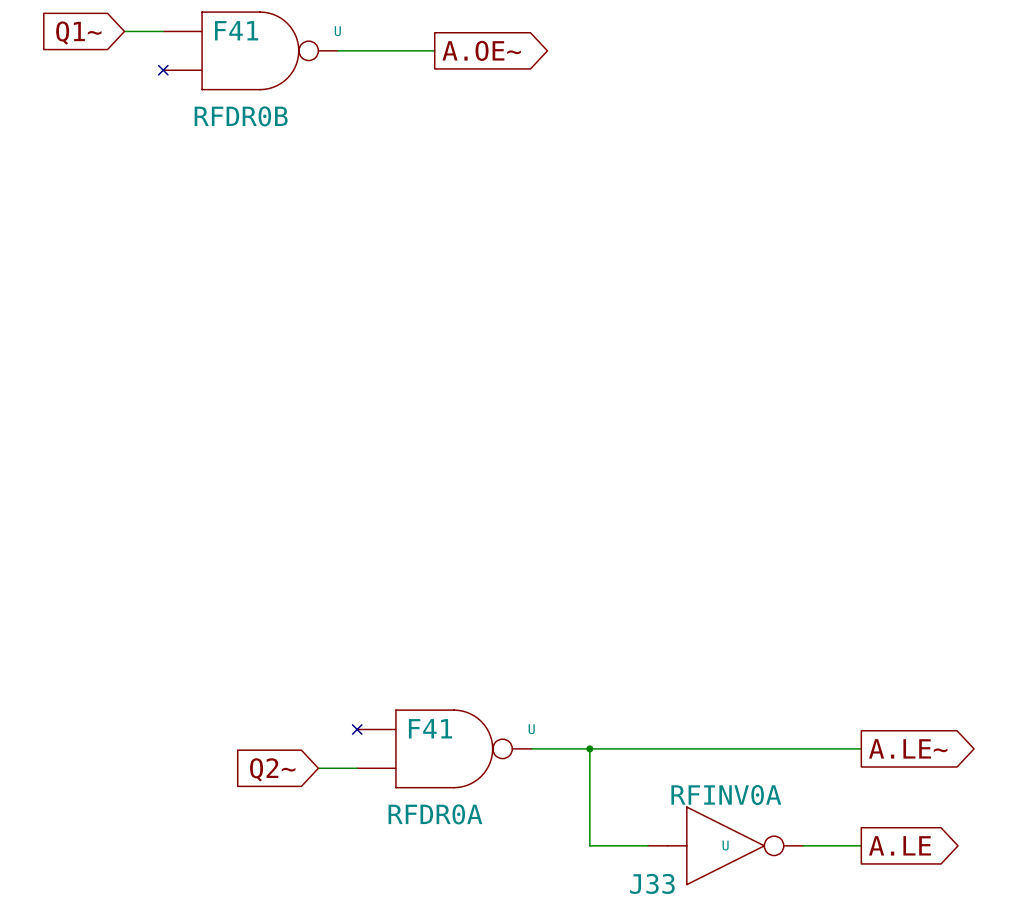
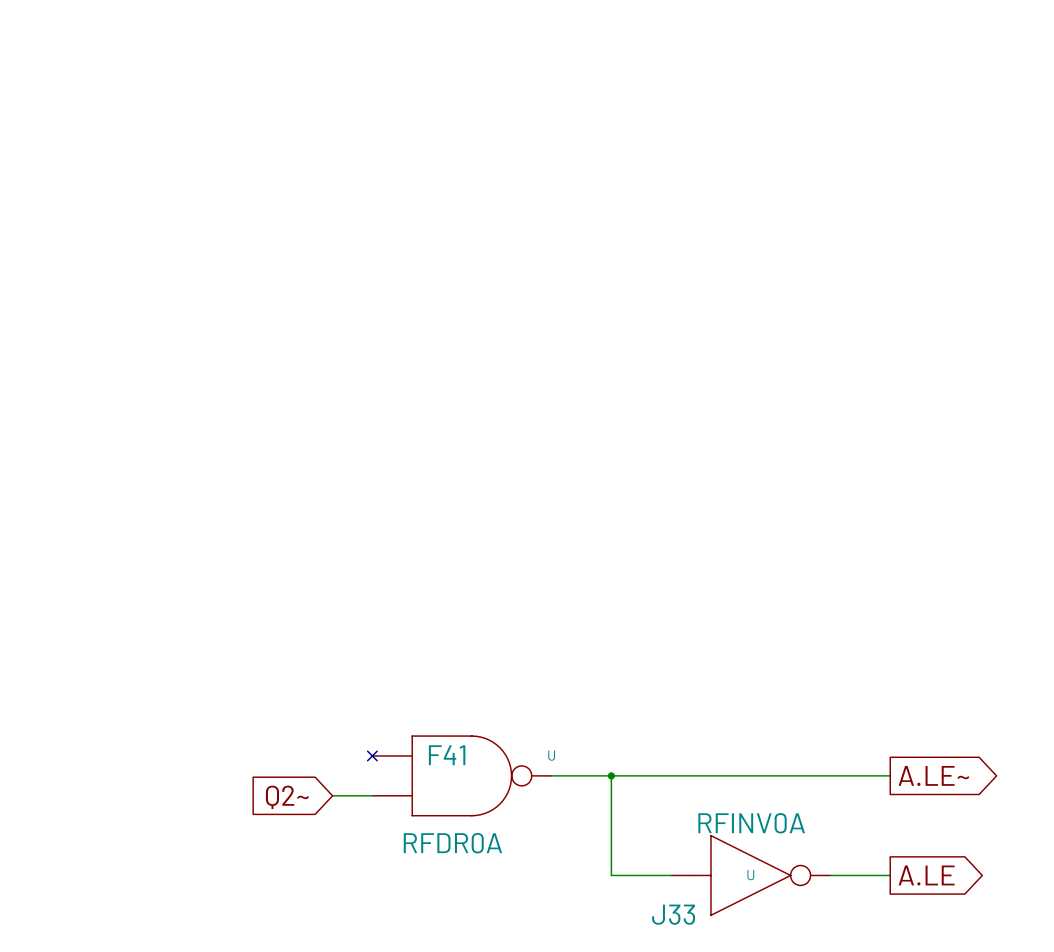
wire: (124, 31) (163, 31) -> none
global label: Q1~ (78, 33) -> none
U: (250, 50) -> none
wire: (337, 50) (434, 50) -> none
global label: A.OE~ (481, 50) -> none
no-connect mark: (163, 70) -> none

